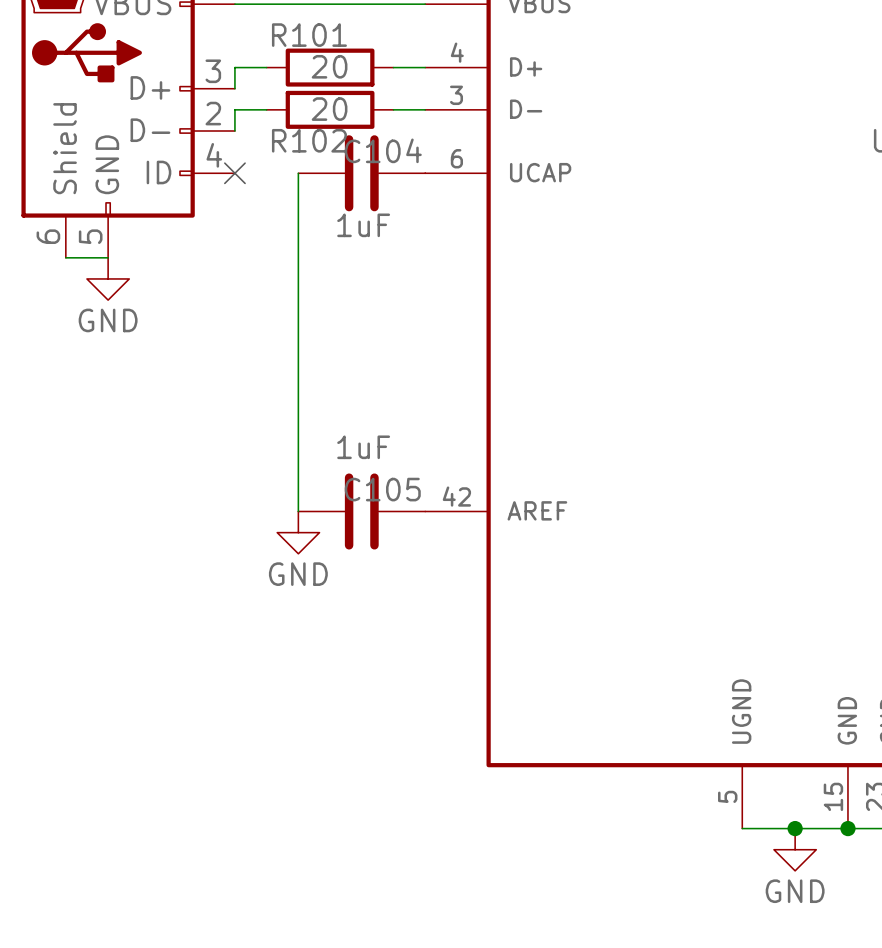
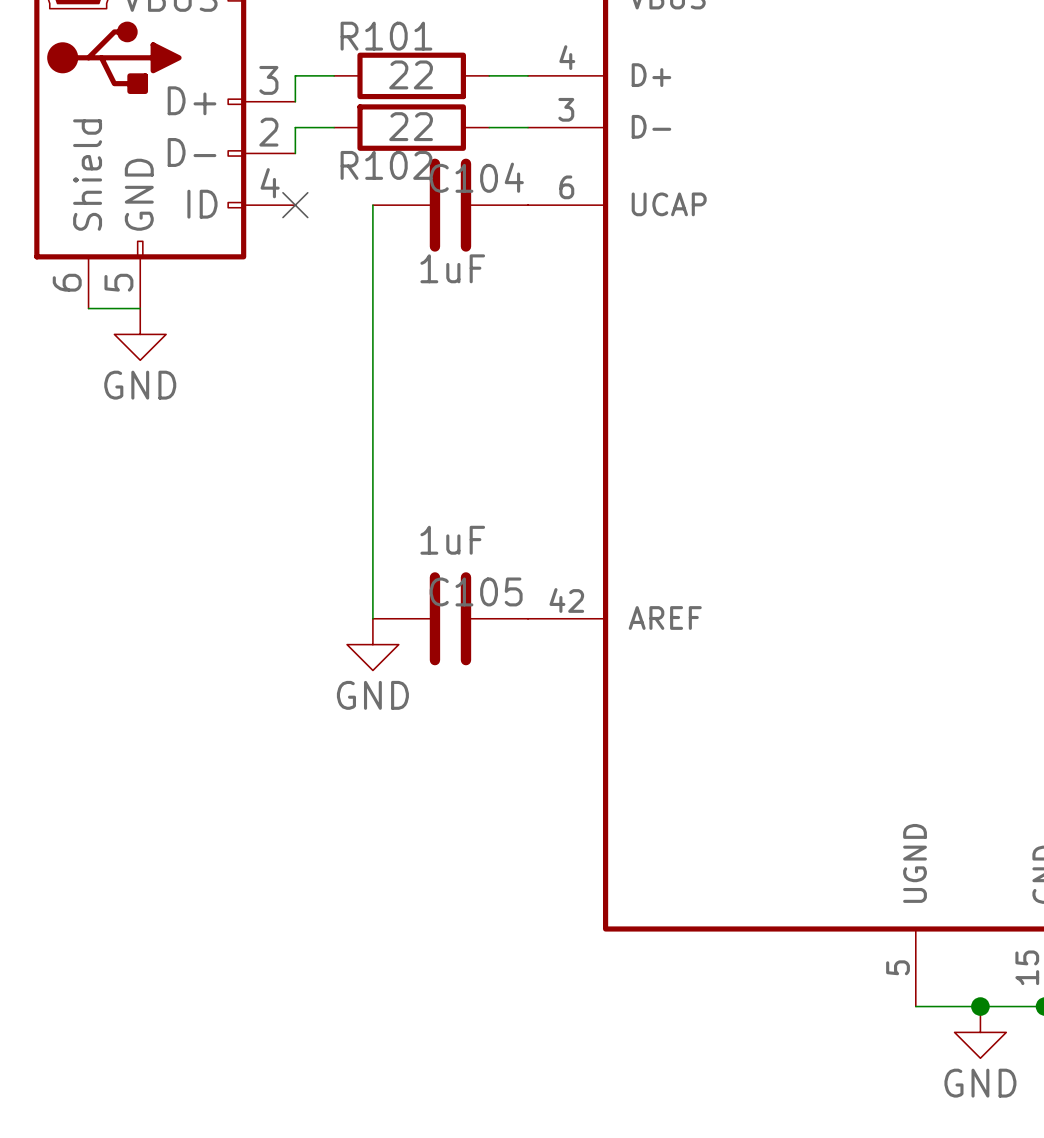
R101 value: 20 (329, 66) -> 22 (411, 74)
R102 value: 20 (329, 109) -> 22 (411, 126)

